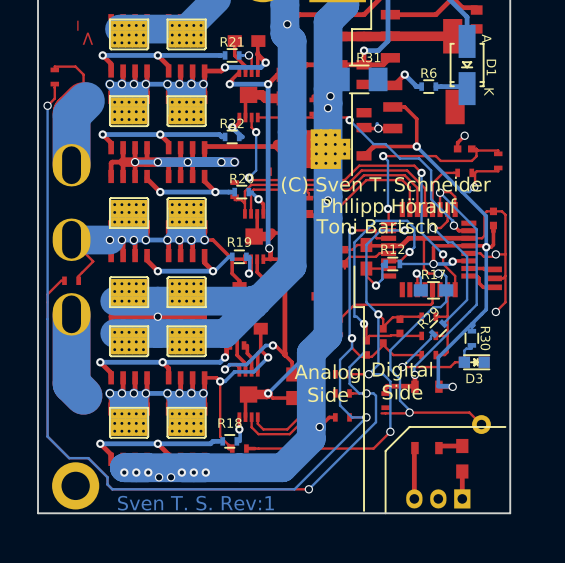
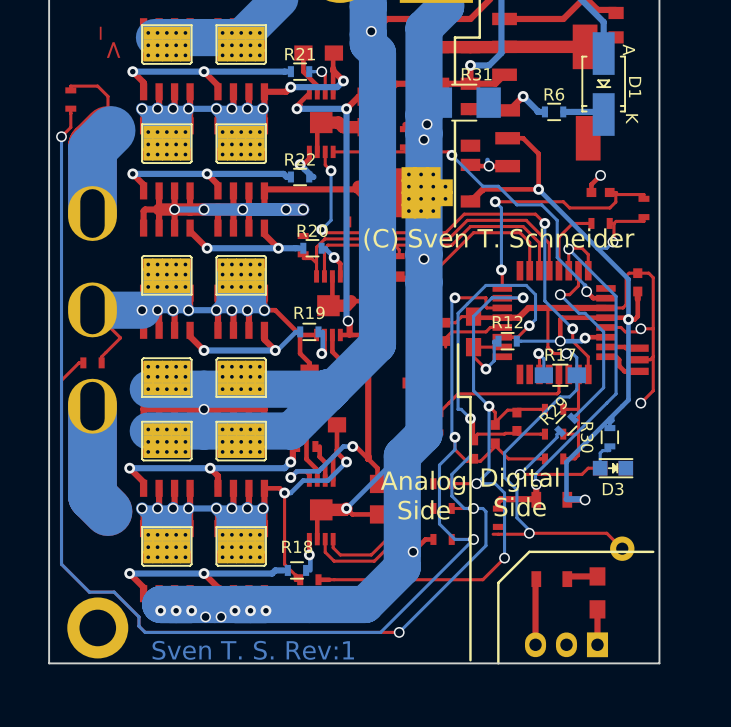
text: Philipp Hörauf (389, 207) -> none
text: Toni Bartsch (376, 226) -> none
R30 name position: R30 (485, 338) -> R30 (587, 437)

